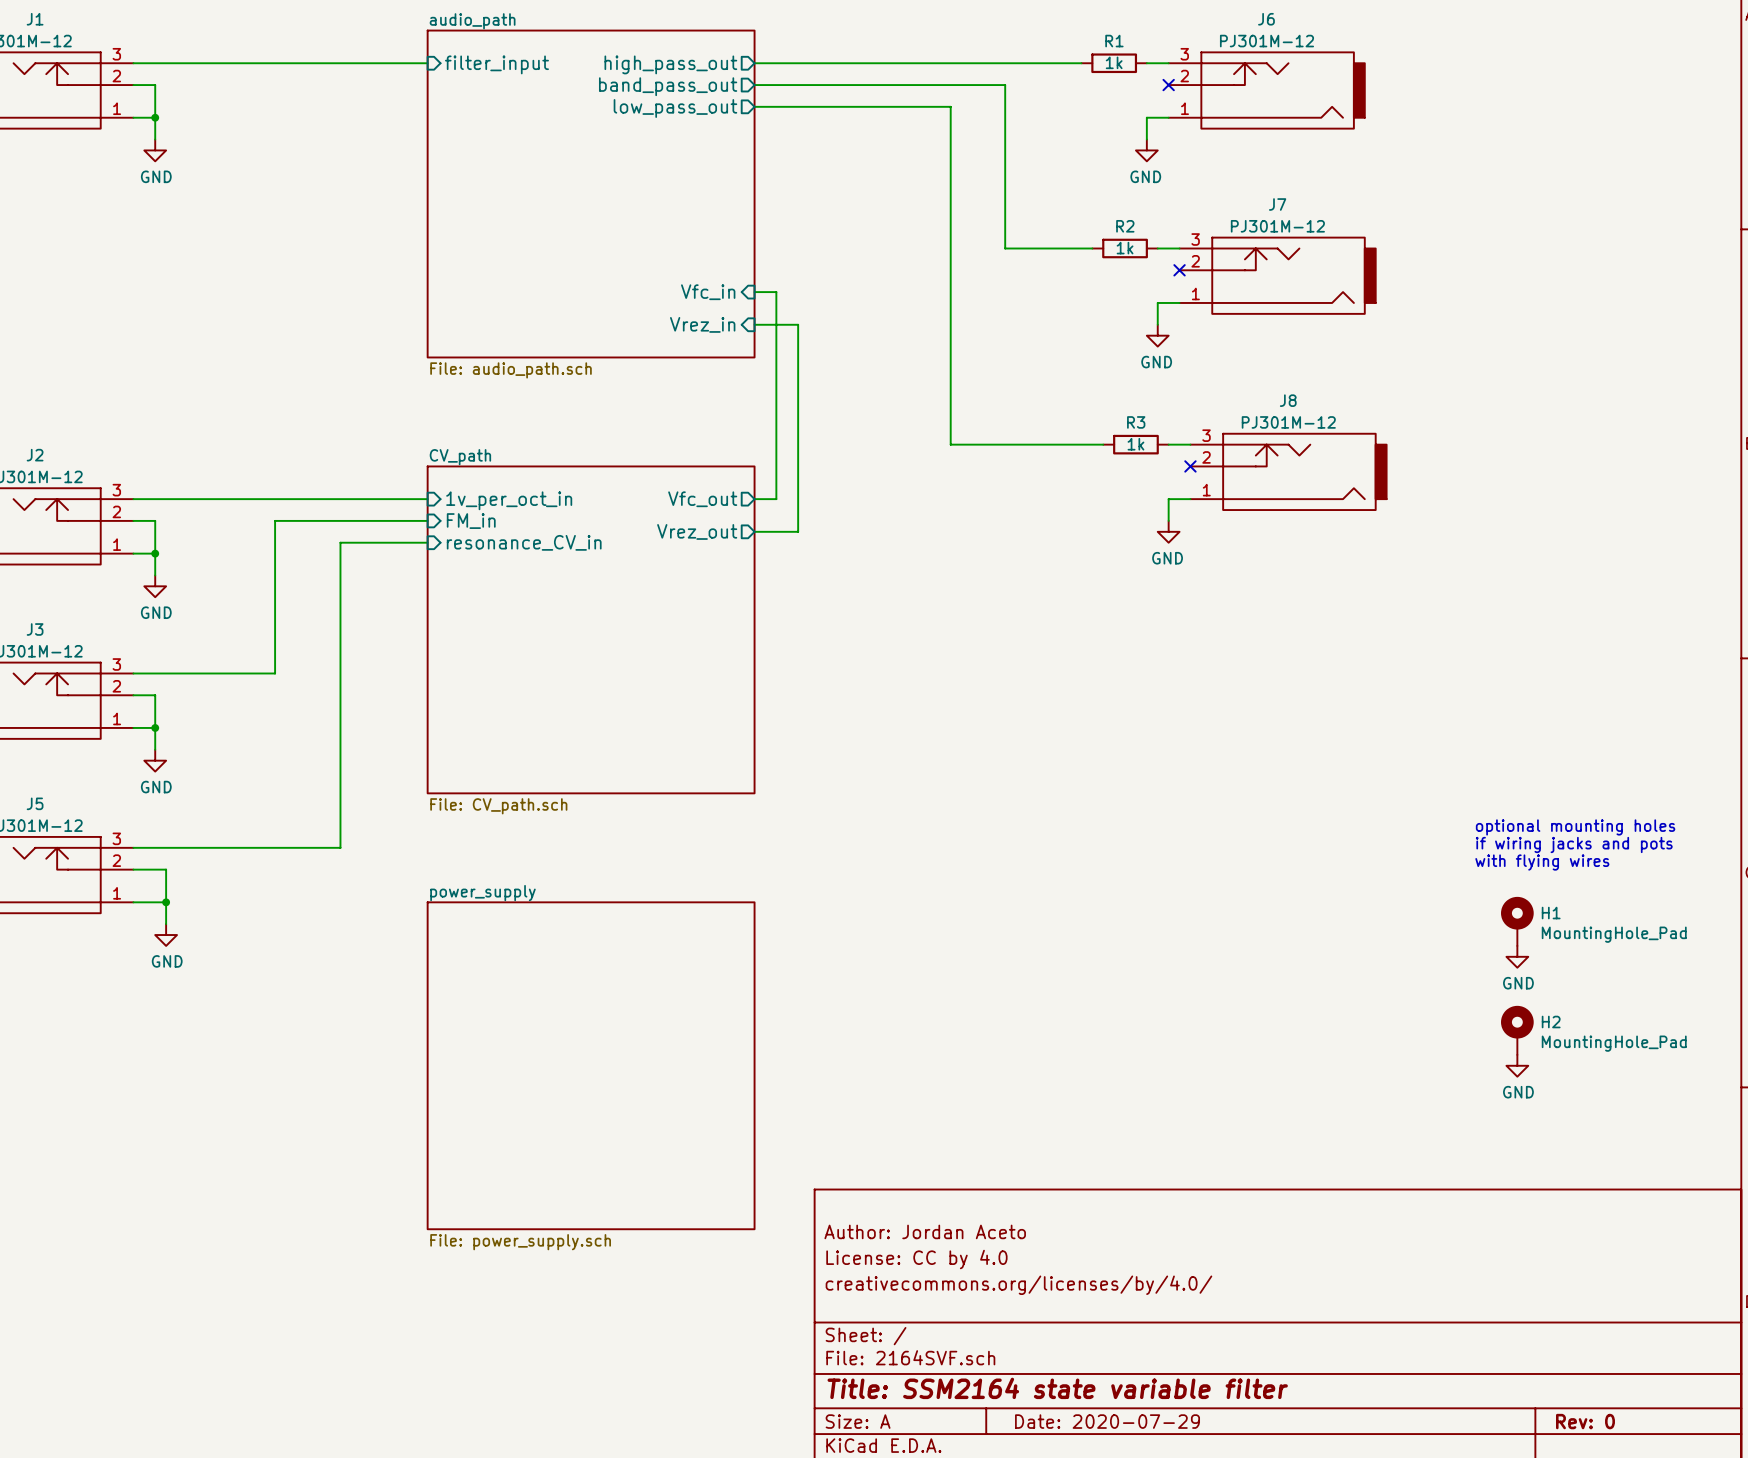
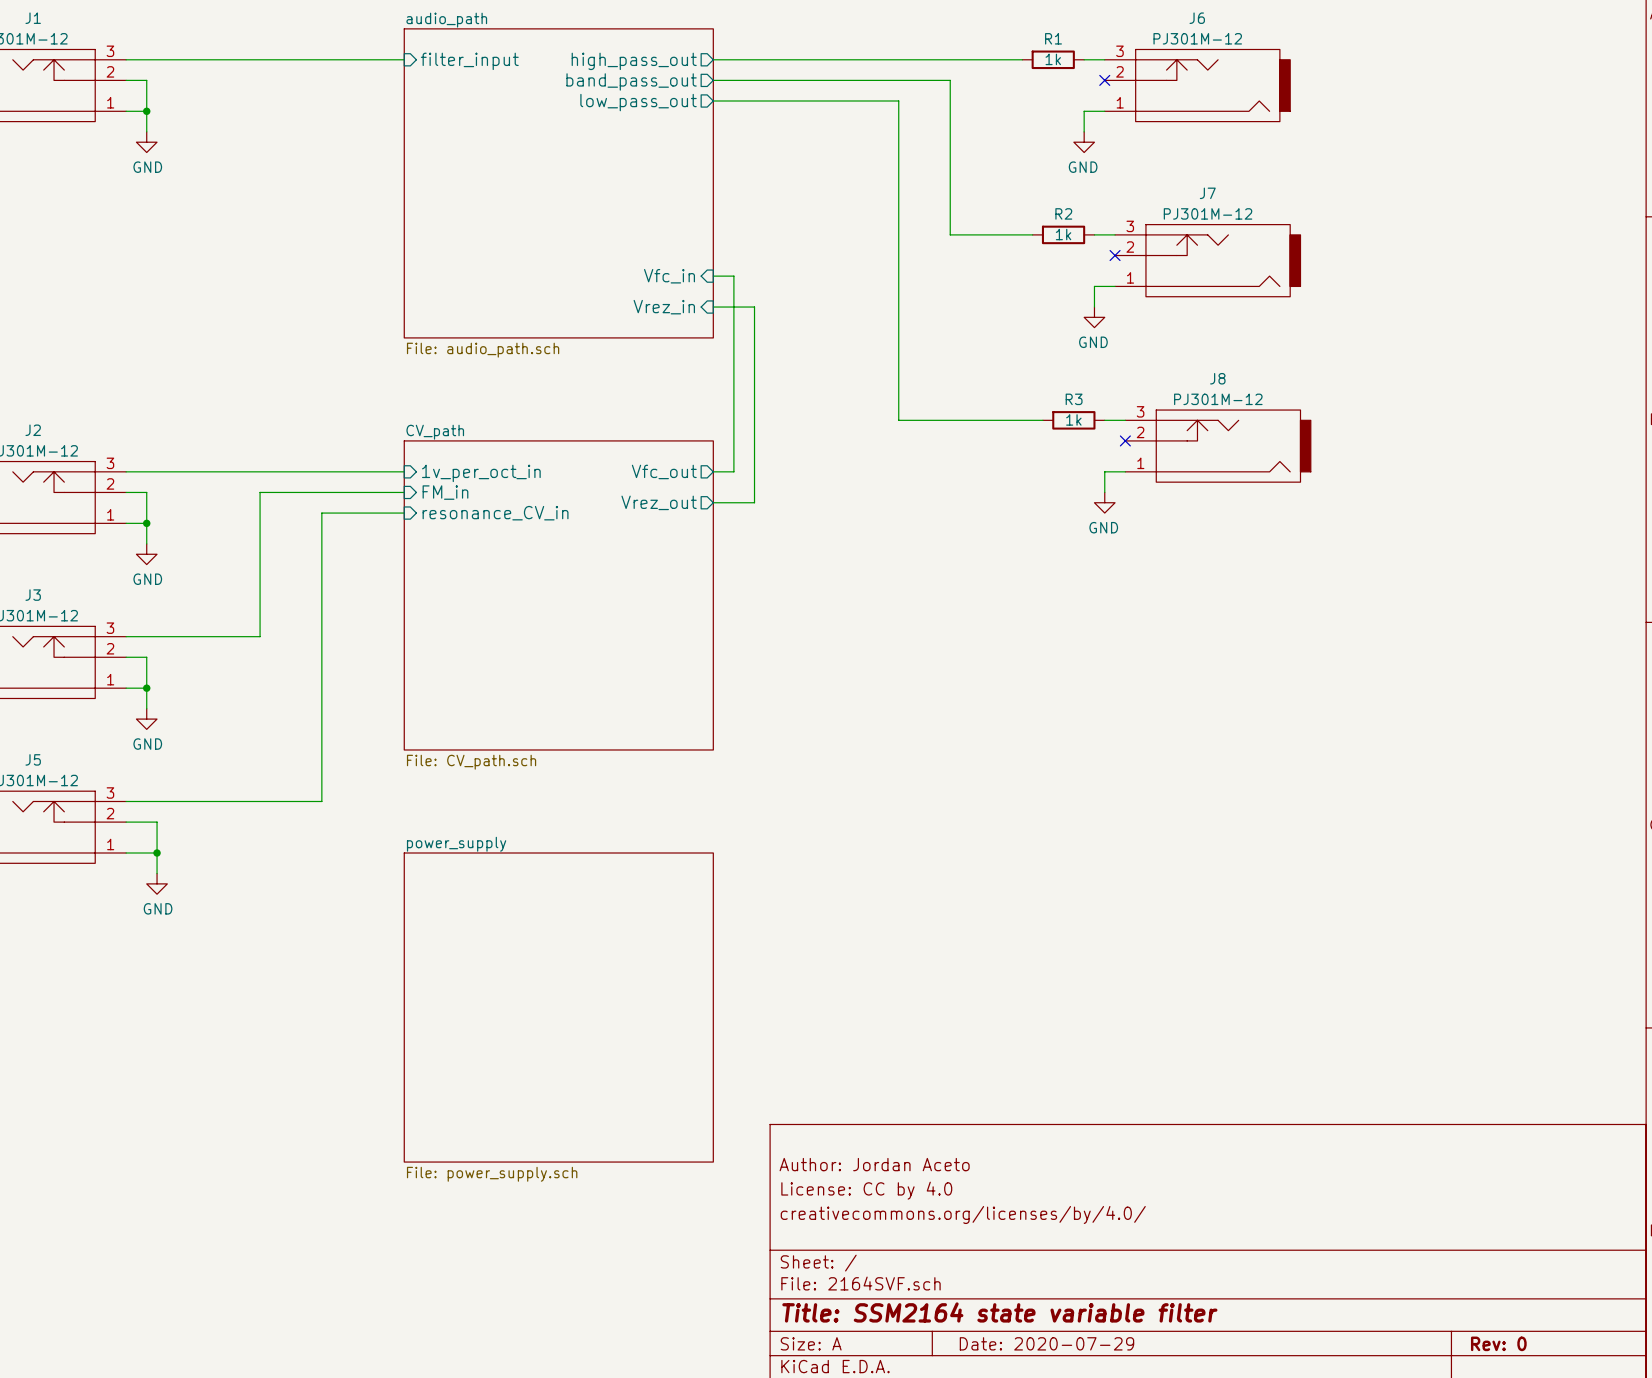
text: optional mounting holes (1575, 827) -> none
text: if wiring jacks and pots (1574, 844) -> none
text: with flying wires (1542, 862) -> none
H1: MountingHole_Pad (1517, 921) -> none
power symbol: GND (1517, 956) -> none
H2: MountingHole_Pad (1517, 1030) -> none
power symbol: GND (1517, 1065) -> none

